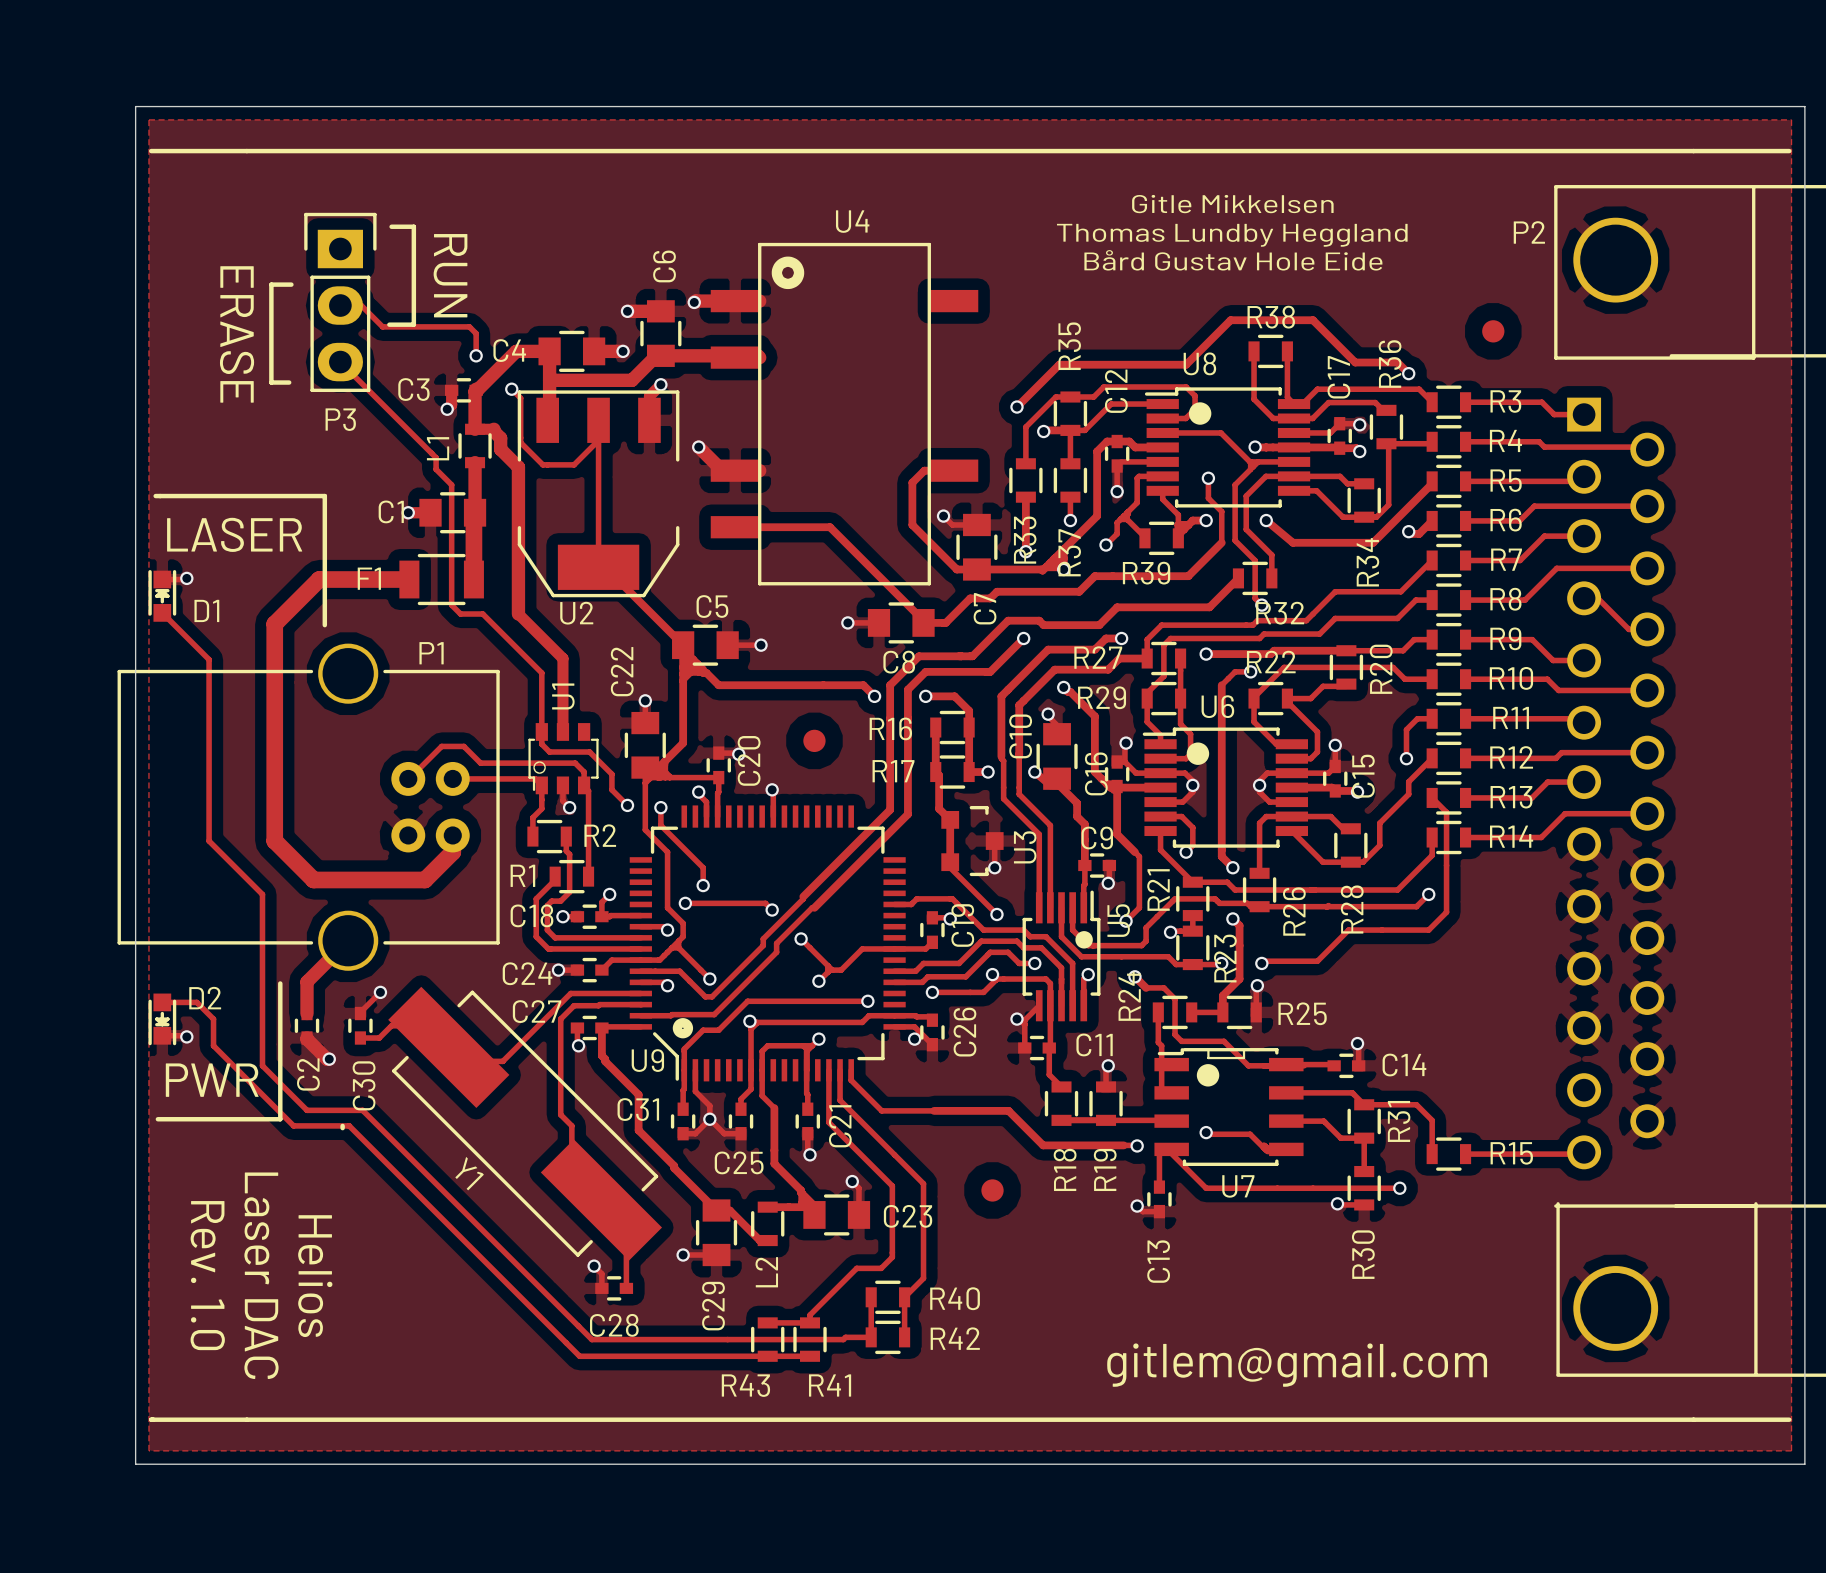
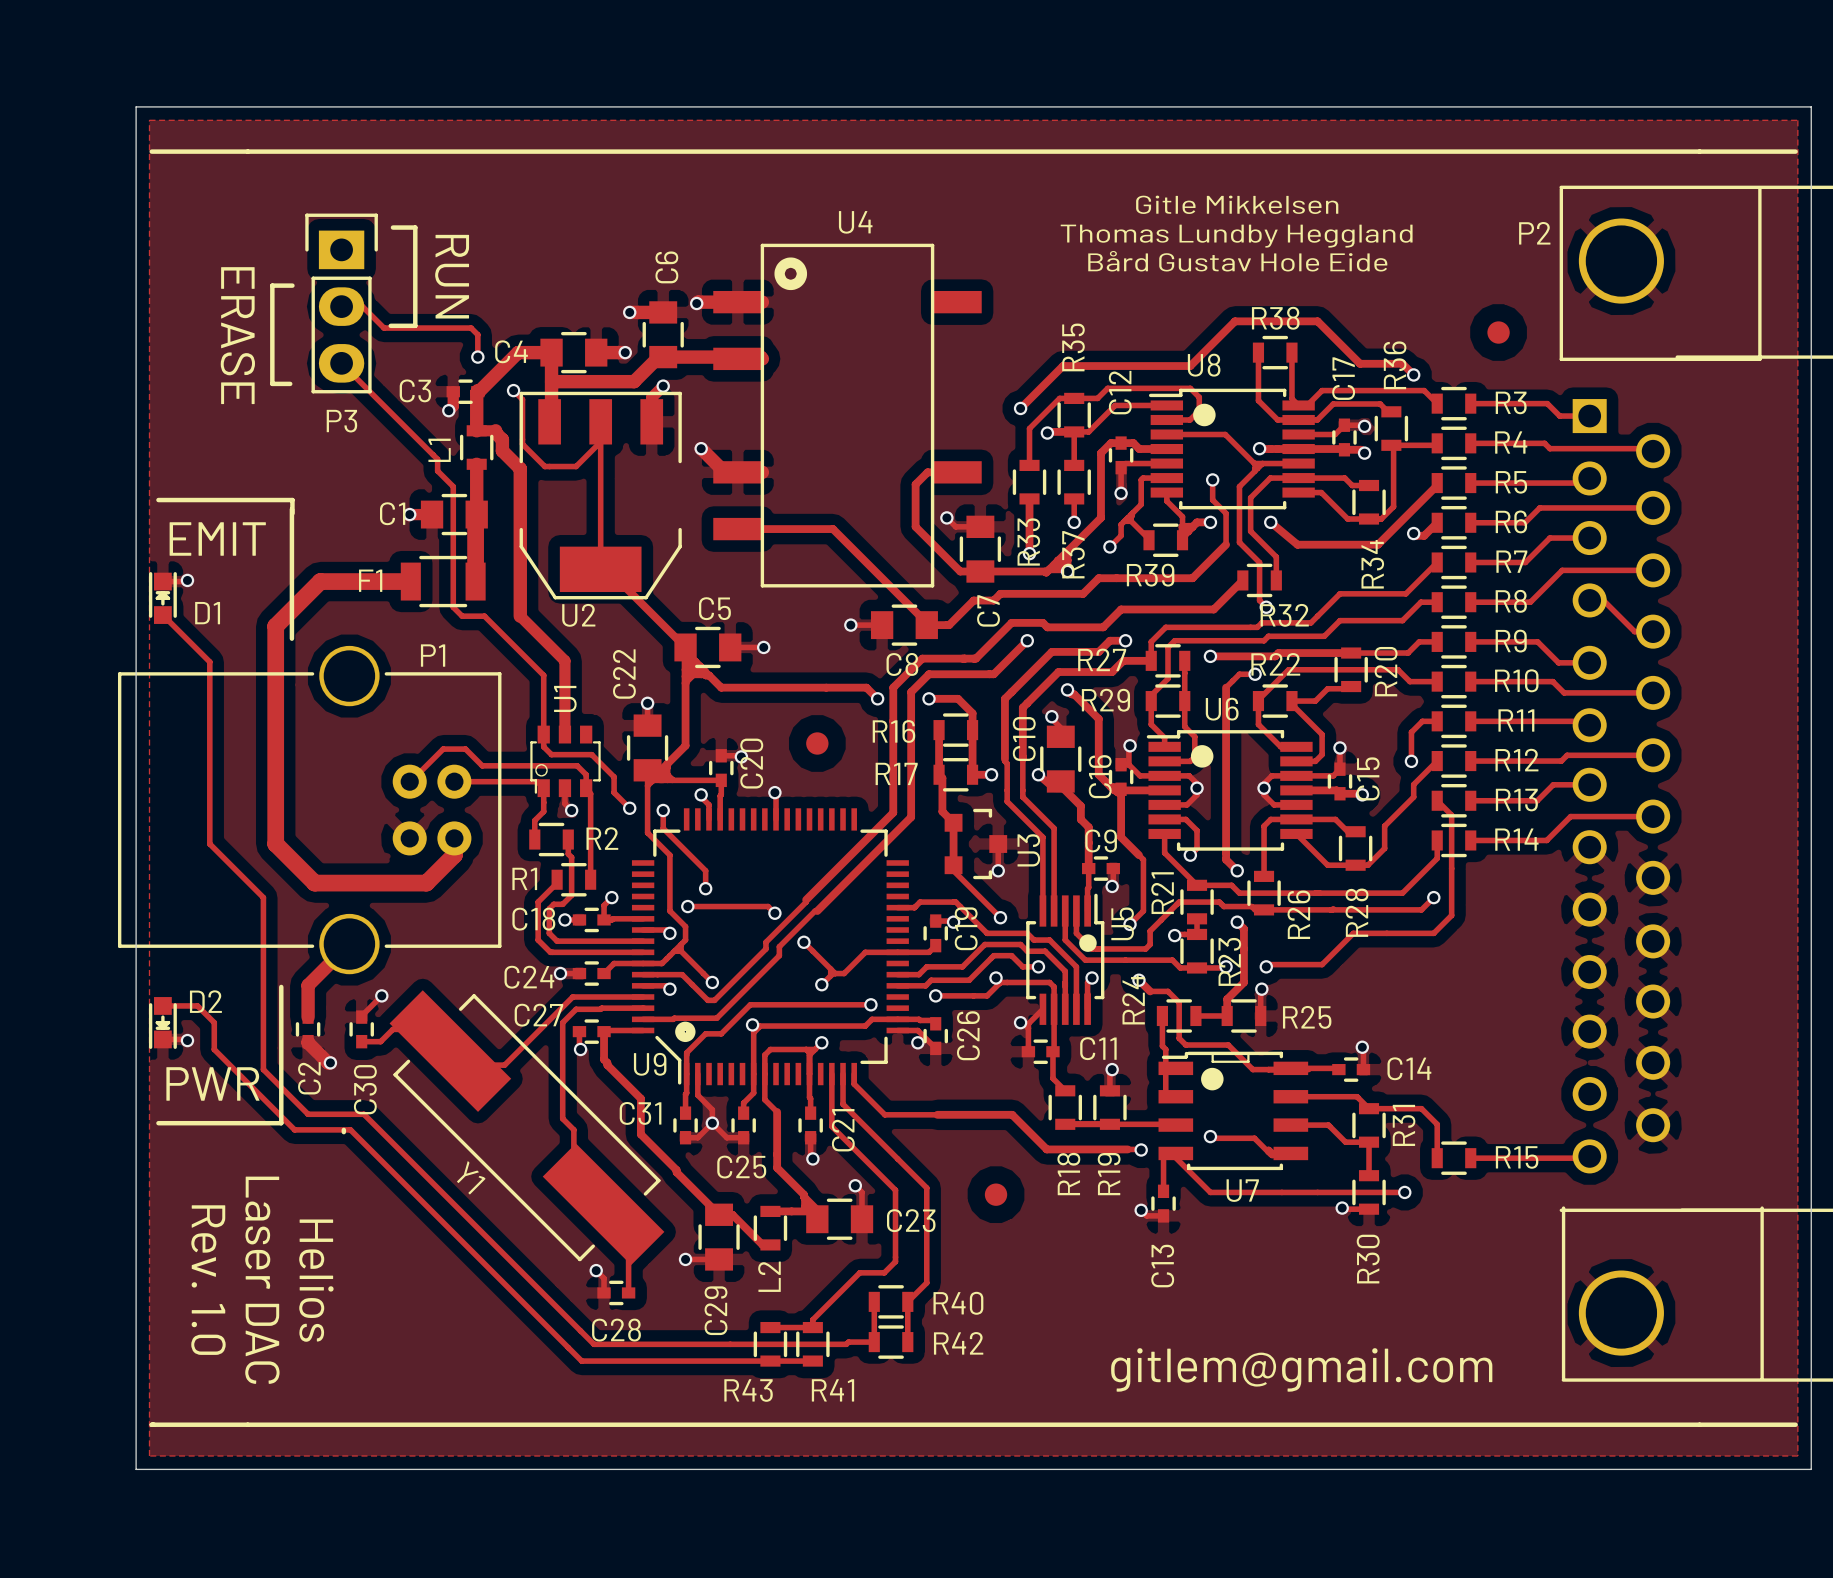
line: (155, 496) (324, 496) (324, 625) -> none
line: none -> (158, 500) (292, 500) (292, 513)
line: none -> (291, 509) (291, 638)
text: LASER (234, 534) -> EMIT (217, 538)

